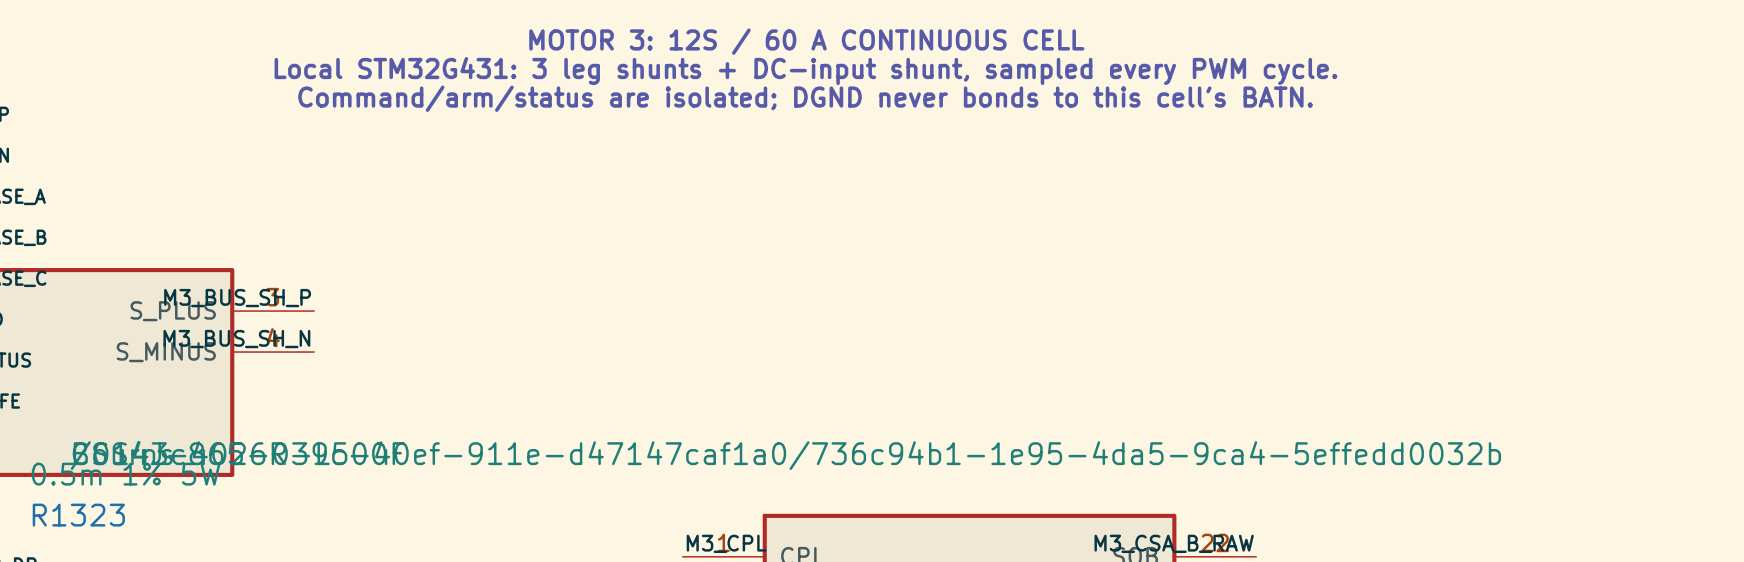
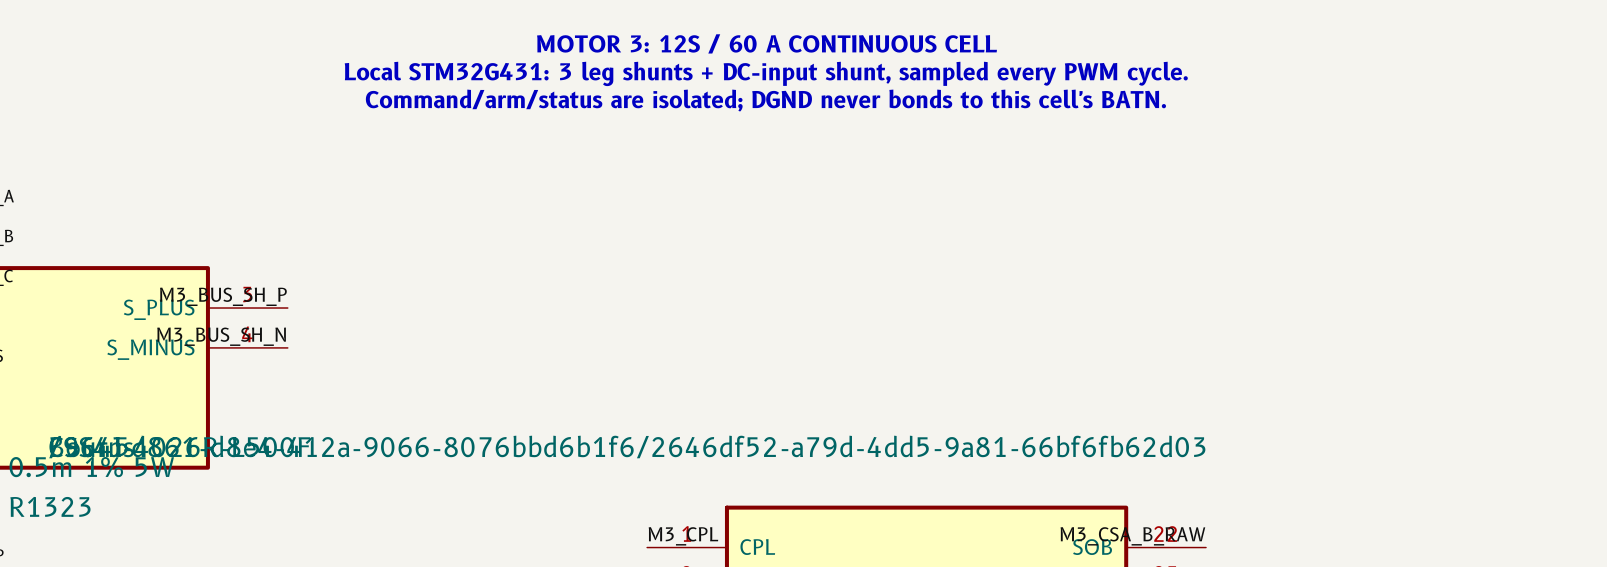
R1323 text: /0143c865-039c-40ef-911e-d47147caf1a0/736c94b1-1e95-4da5-9ca4-5effedd0032b (785, 455) -> /9645d861-d8e4-412a-9066-8076bbd6b1f6/2646df52-a79d-4dd5-9a81-66bf6fb62d03 (627, 446)

